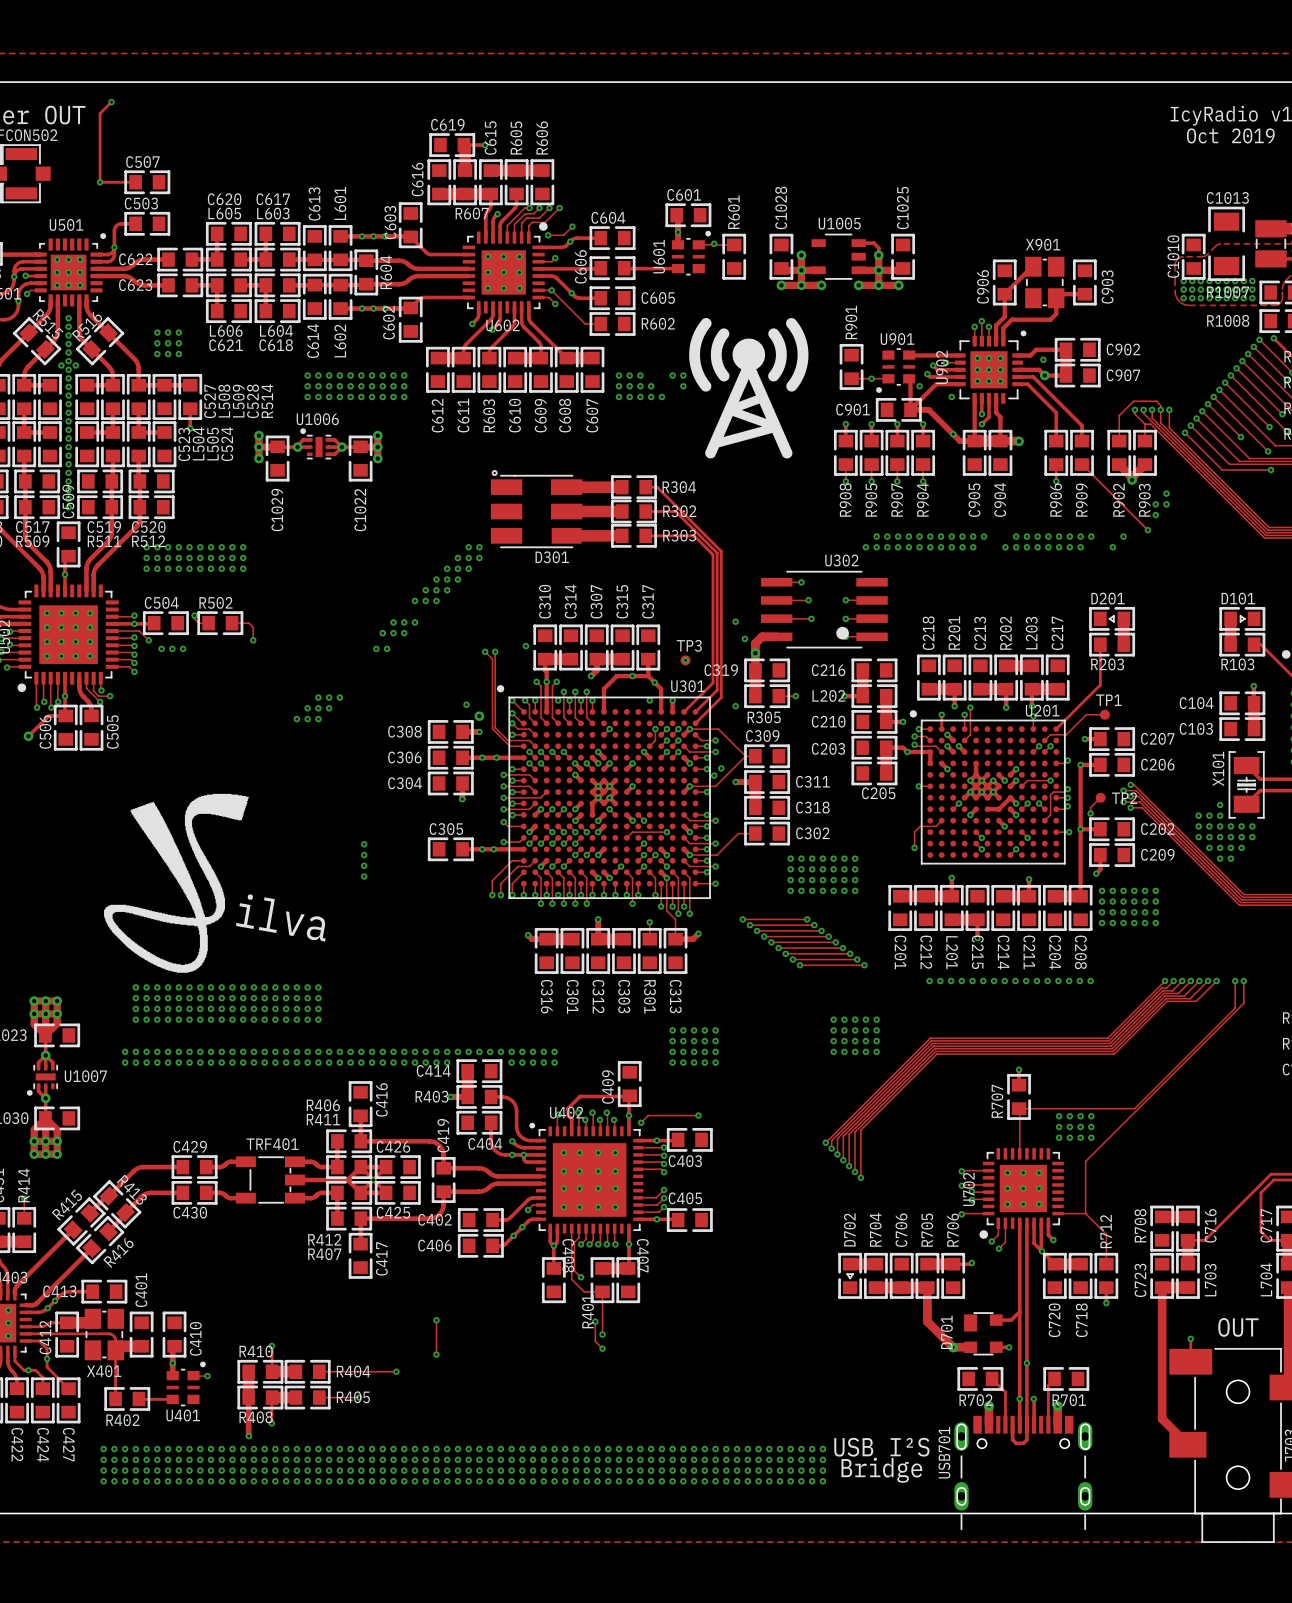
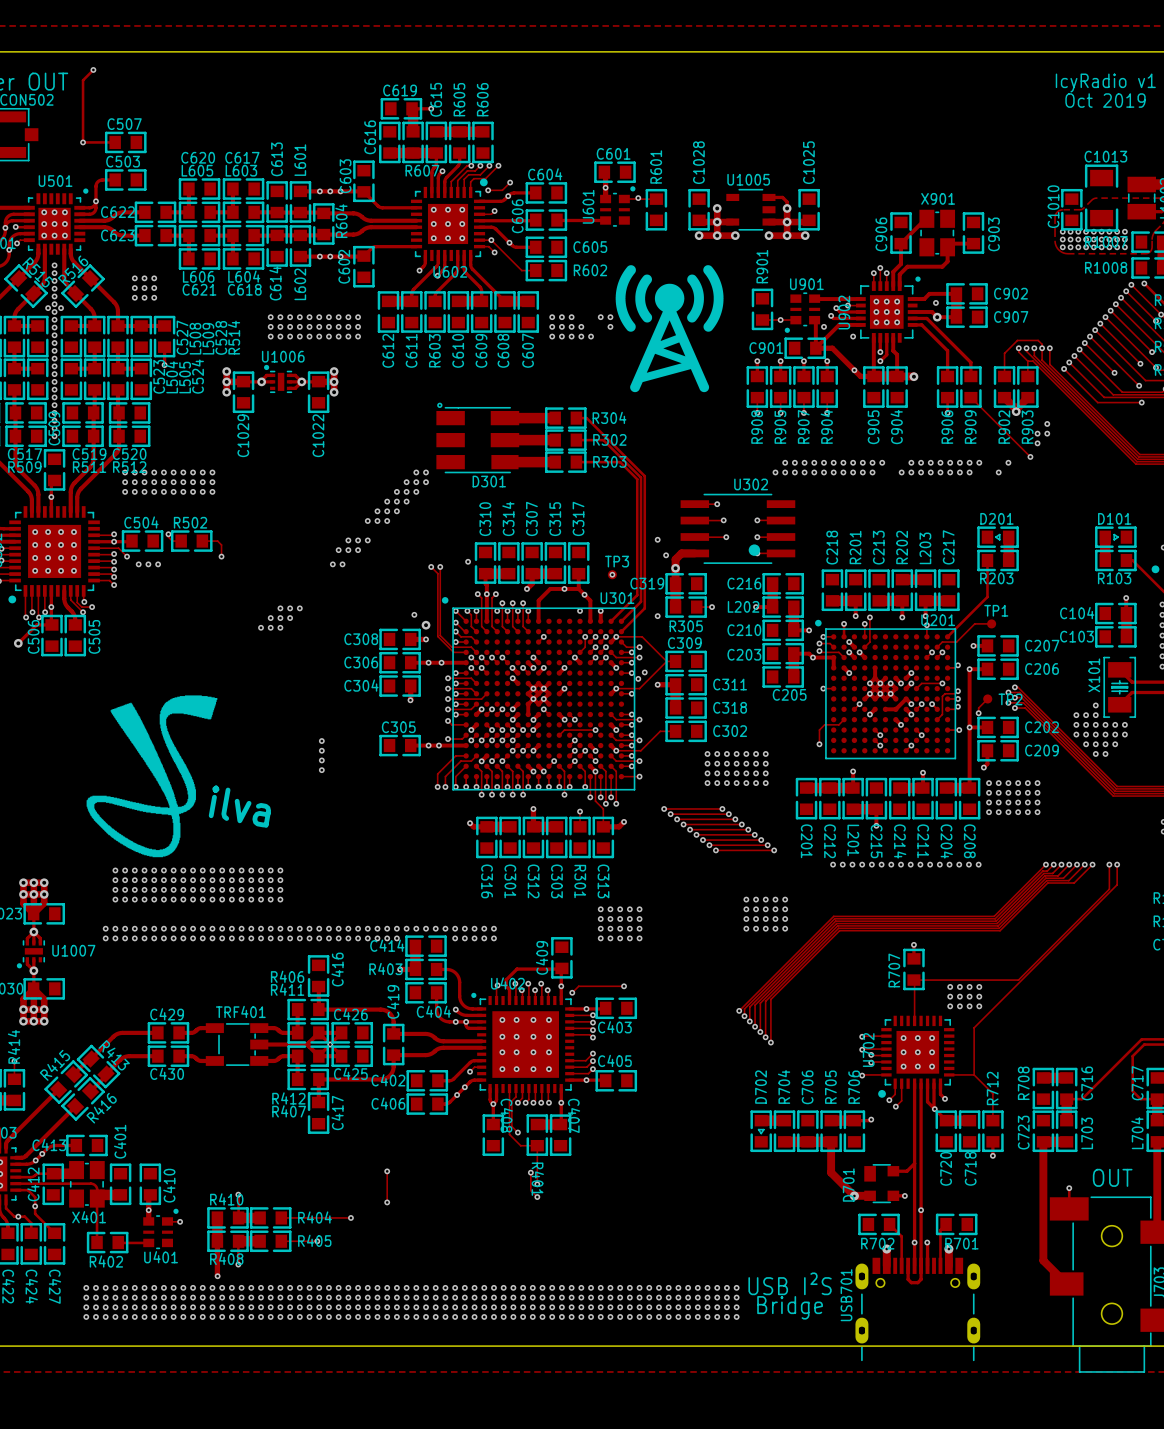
R401 name rotation: 0° (587, 1311) -> 180° (537, 1179)

